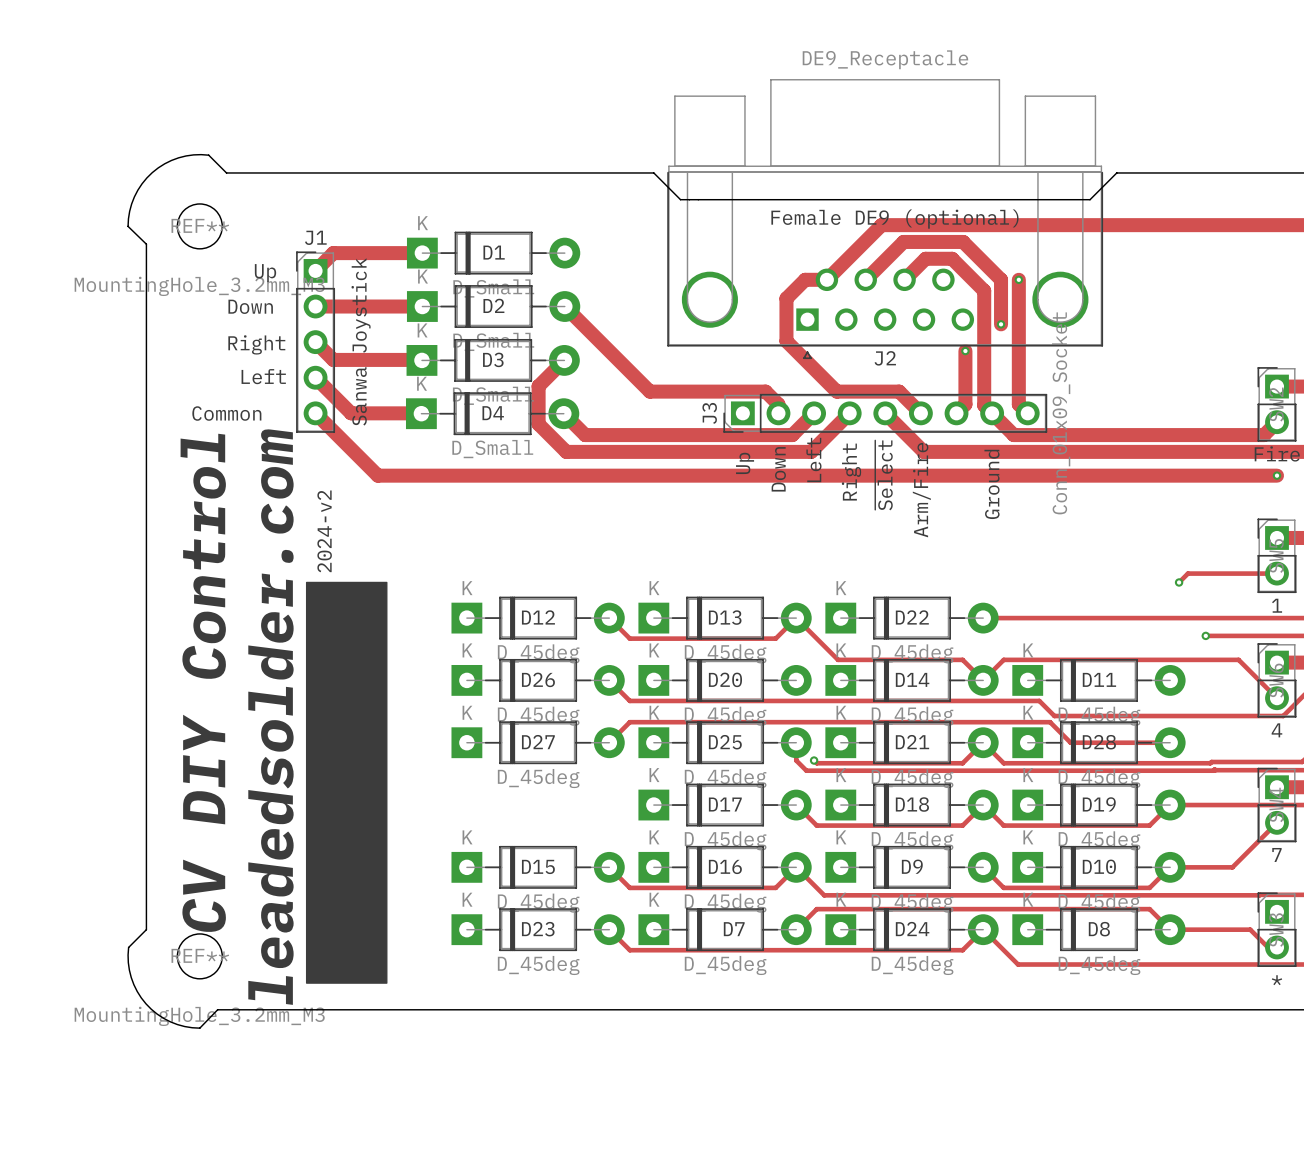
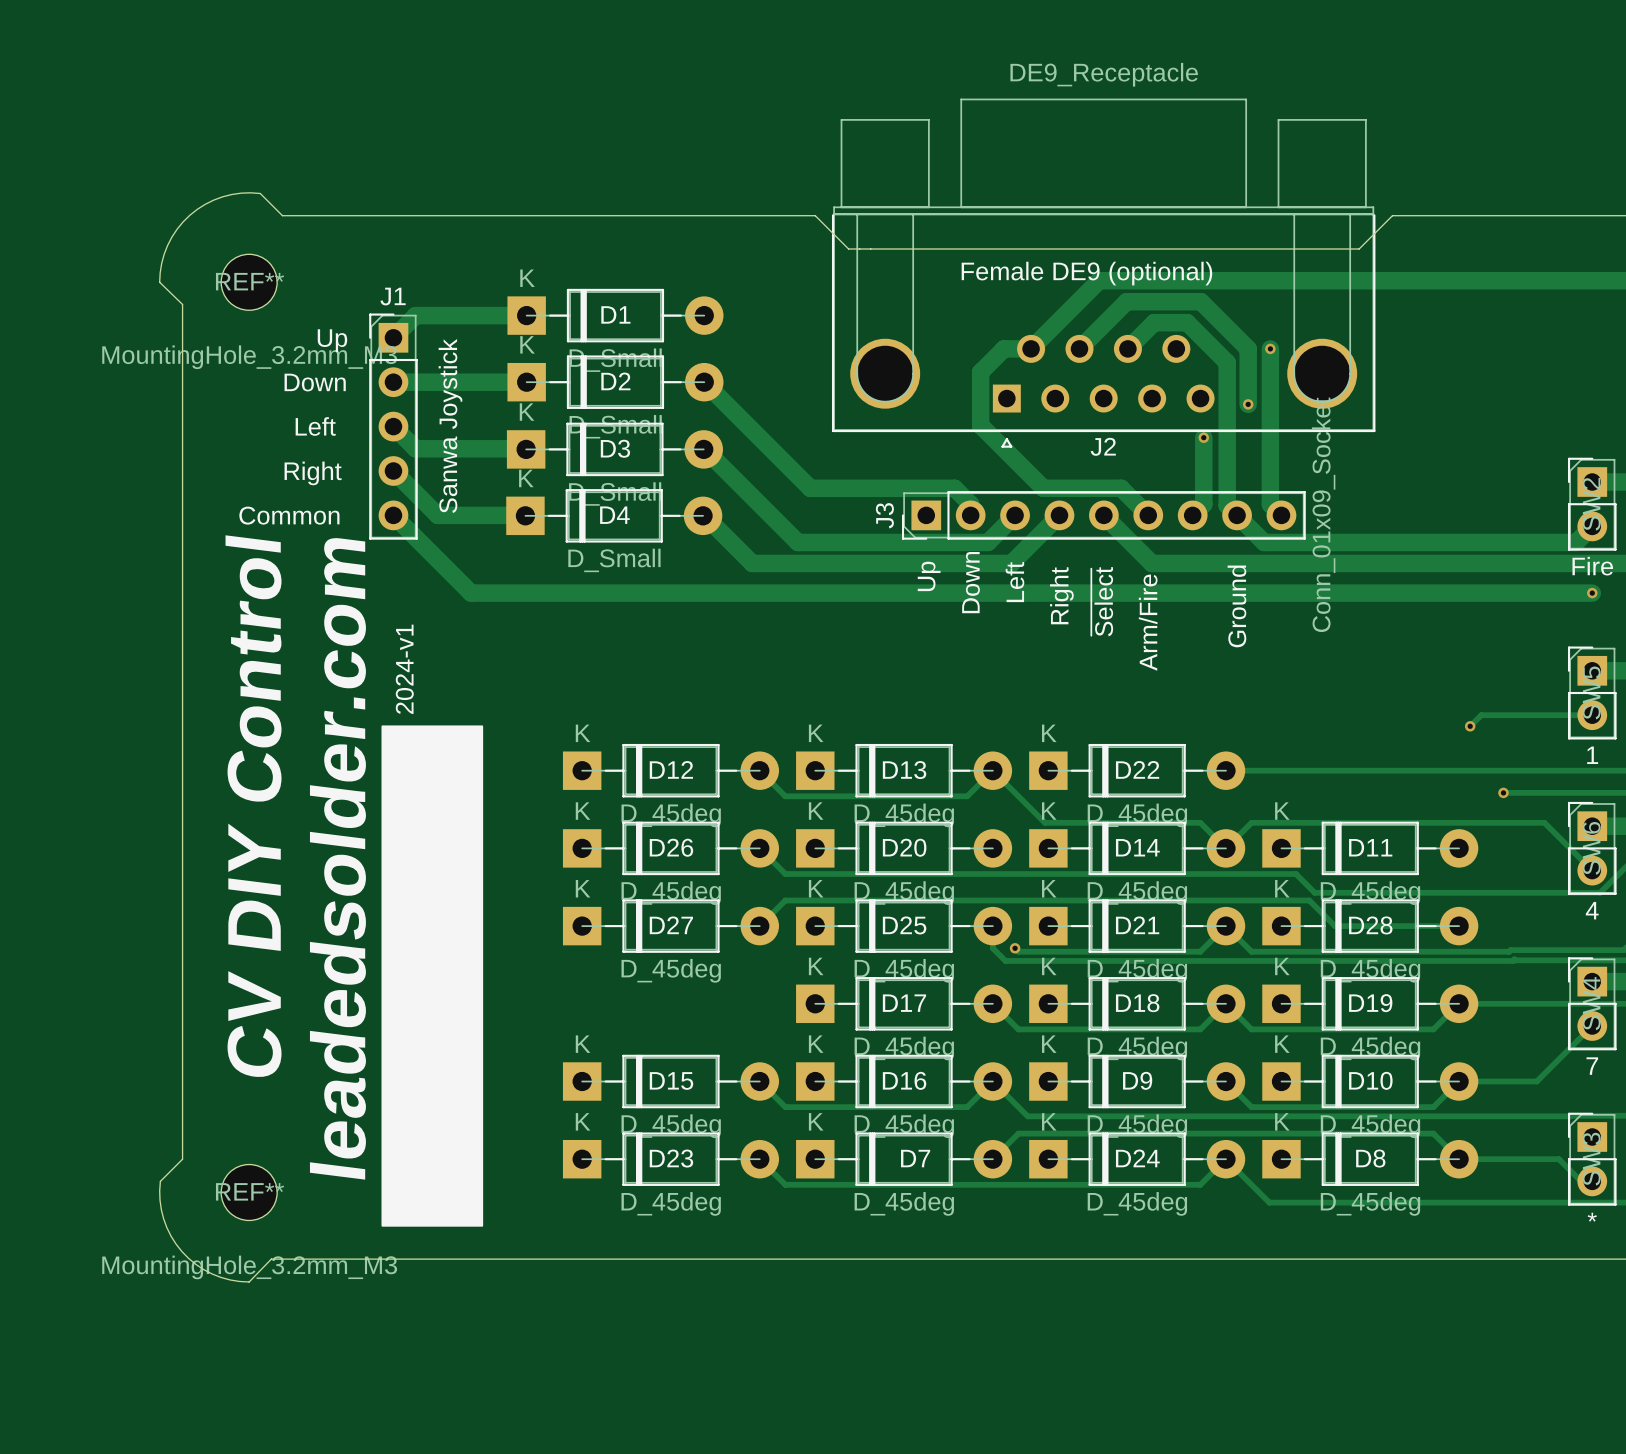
text: Right (256, 344) -> Left (315, 426)
track: (564, 360) (538, 386) (538, 424) (566, 451) (603, 451) -> (704, 515) (752, 563)
text: Left (263, 376) -> Right (313, 473)
track: (563, 413) (585, 435) (639, 435) -> (704, 448) (797, 542)
text: 2024-v2 (324, 531) -> 2024-v1 (404, 669)

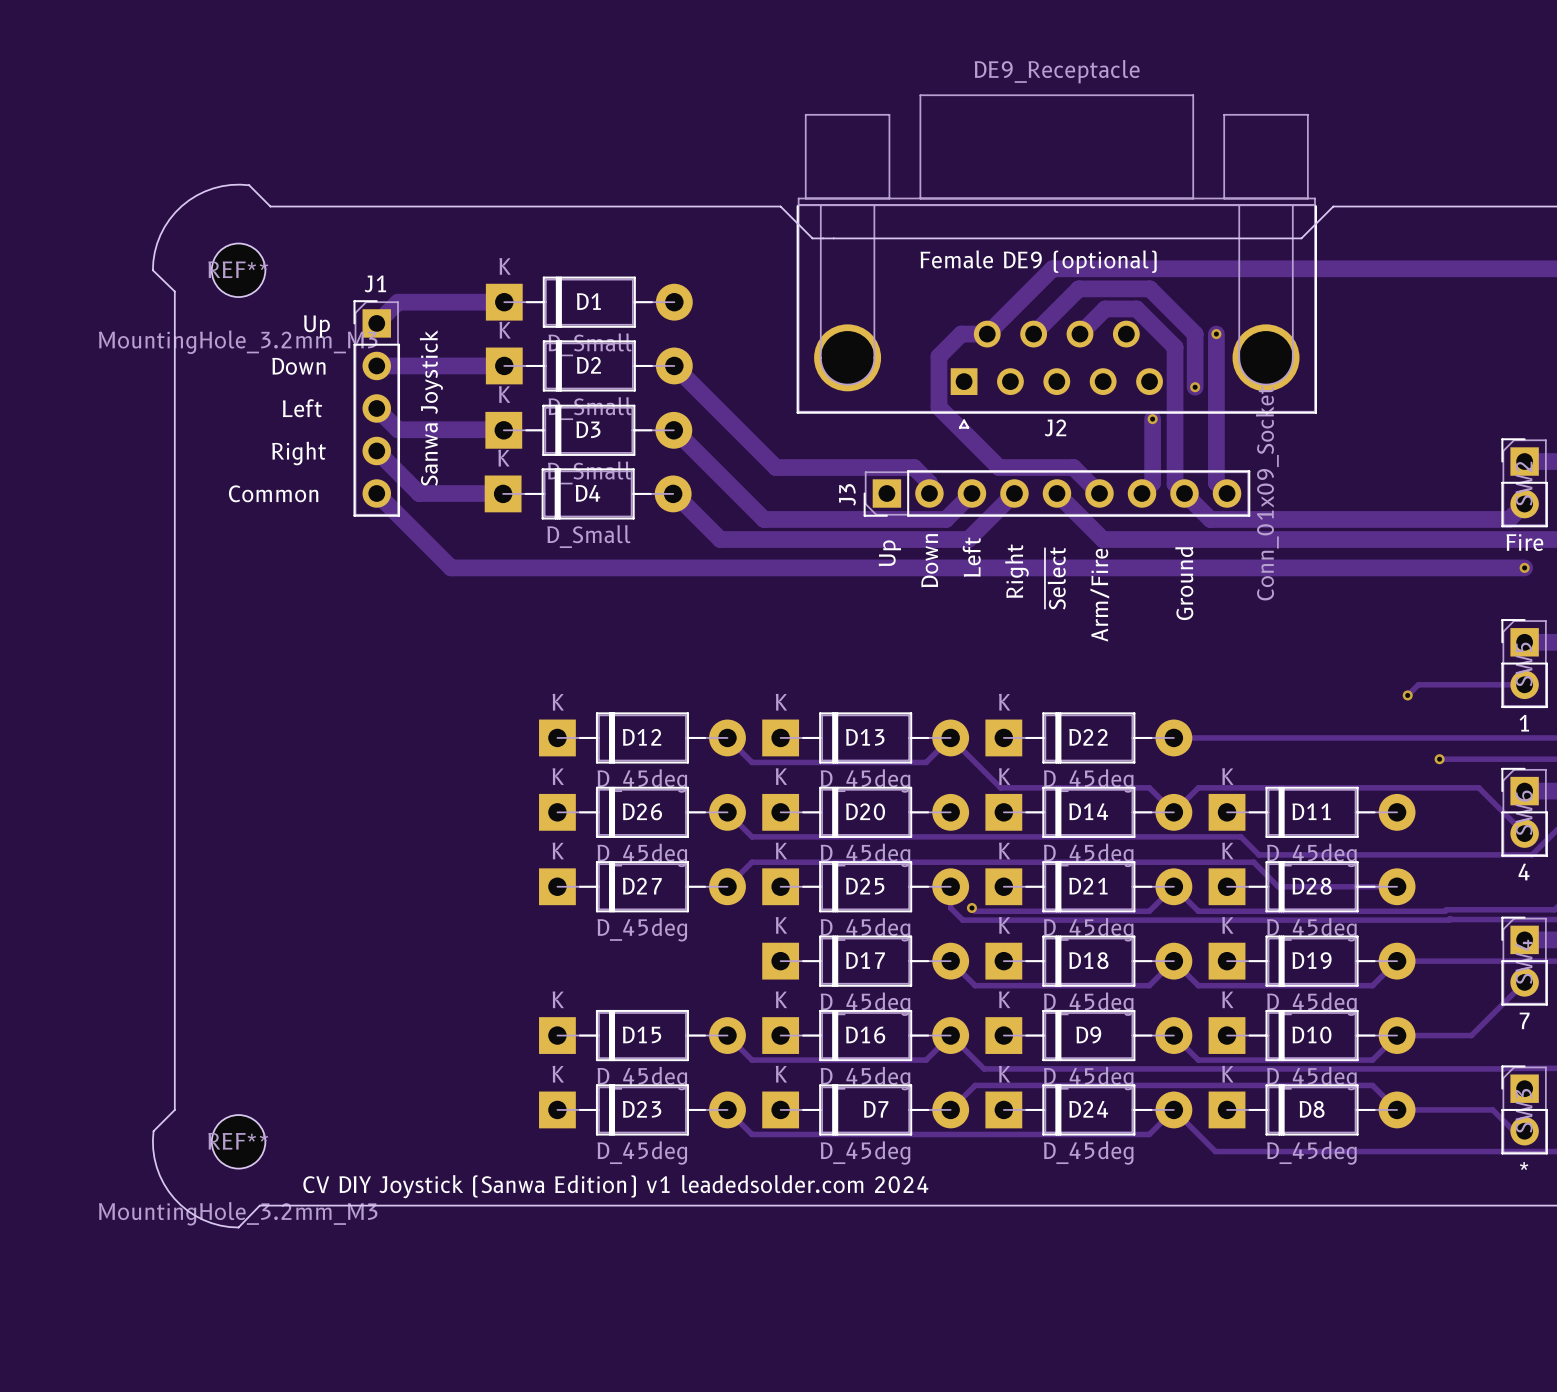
text: 2024-v1 (404, 669) -> none
drawing: [381, 725, 484, 1227] -> none
text: CV DIY Control (253, 806) -> none
text: leadedsolder.com (337, 858) -> none
text: none -> CV DIY Joystick (Sanwa Edition) v1 leadedsolder.com 2024 (615, 1186)

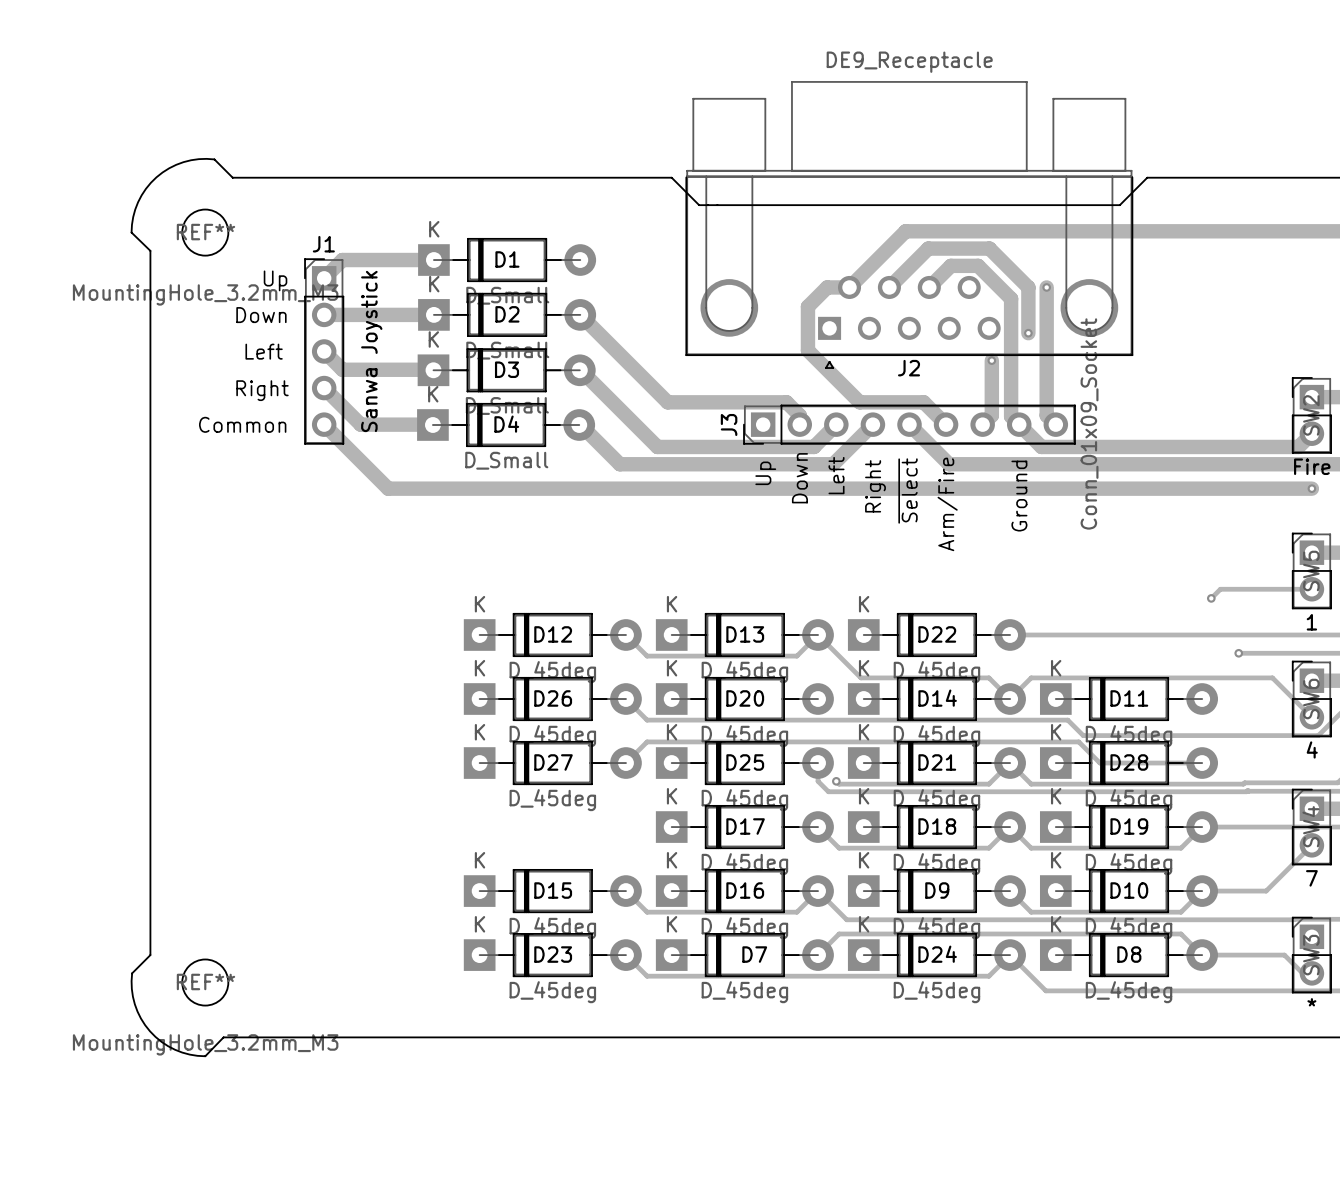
text: Female DE9 (optional) (1038, 262) -> none
text: CV DIY Joystick (Sanwa Edition) v1 leadedsolder.com 2024 (615, 1186) -> none

